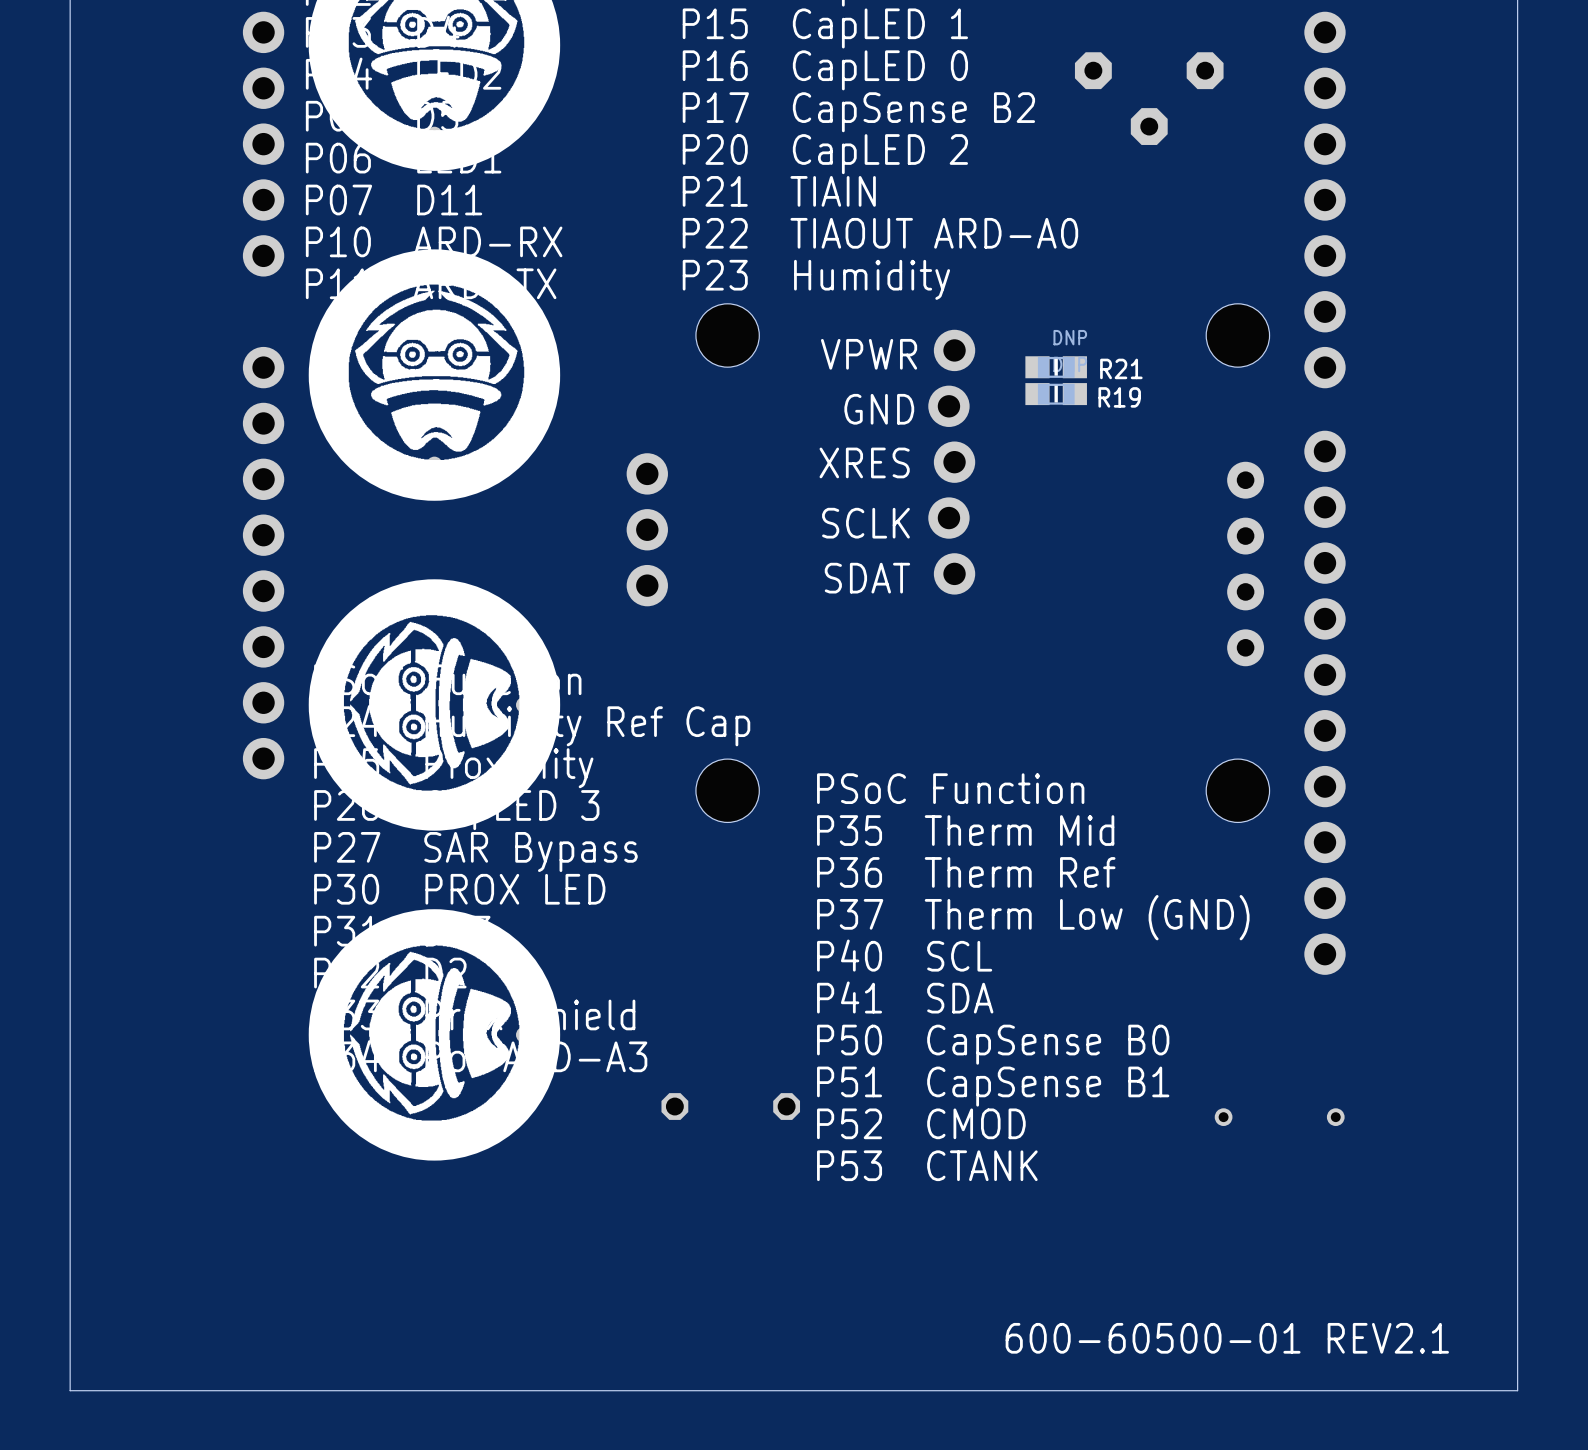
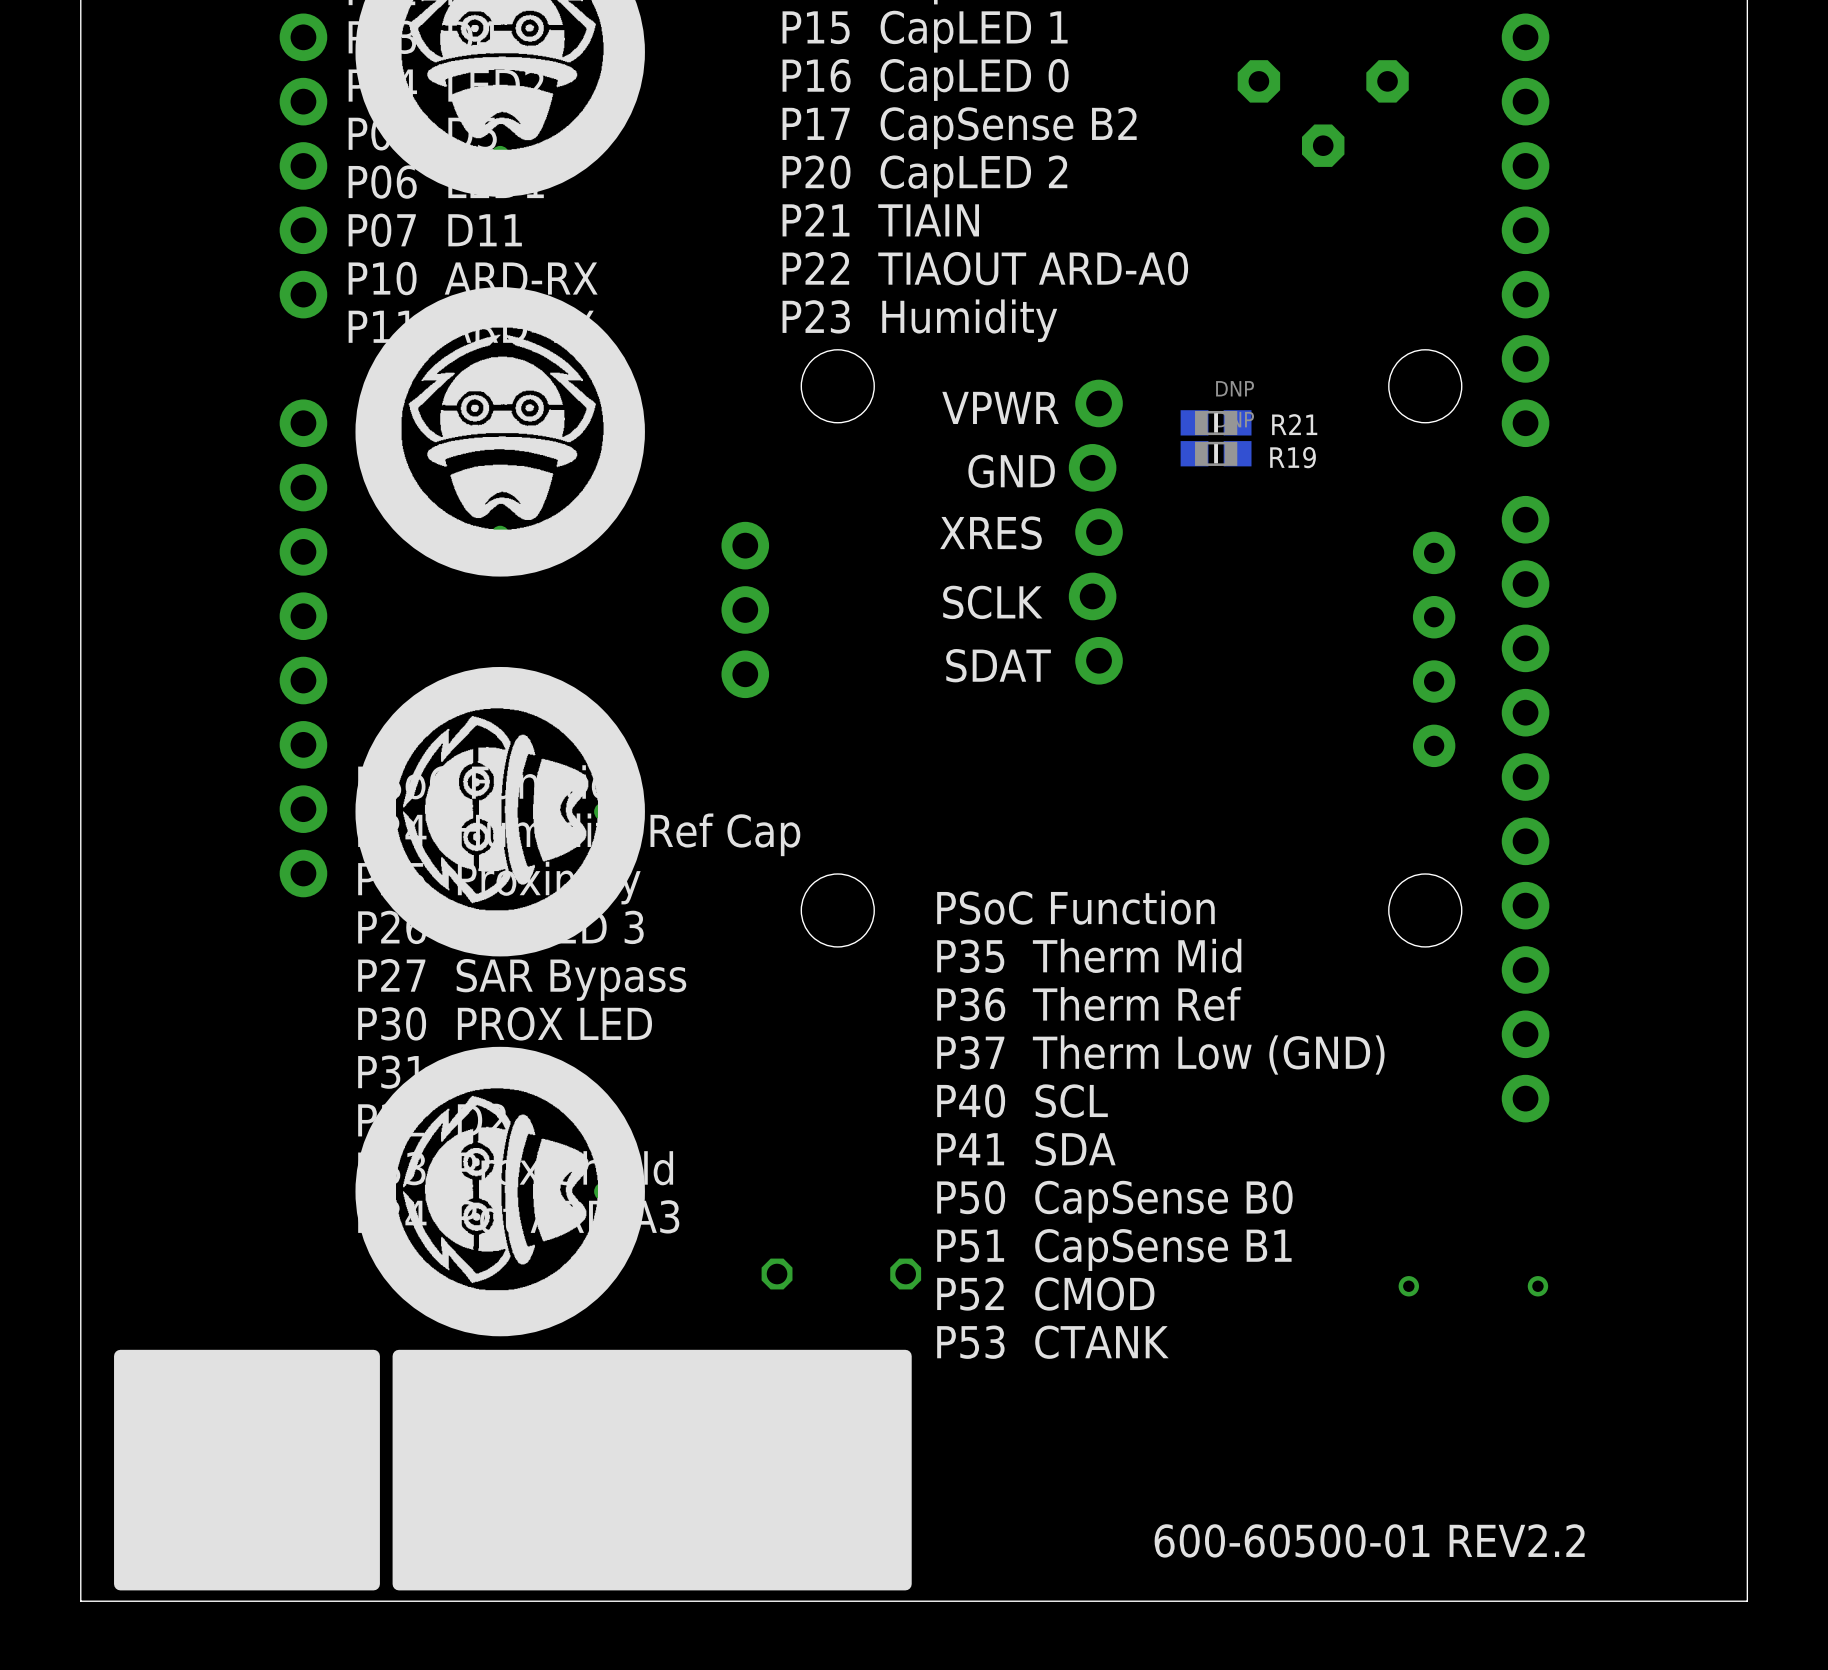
drawing: none -> [114, 1349, 912, 1591]
text: 600-60500-01 REV2.1 (1227, 1338) -> 600-60500-01 REV2.2 (1369, 1540)

